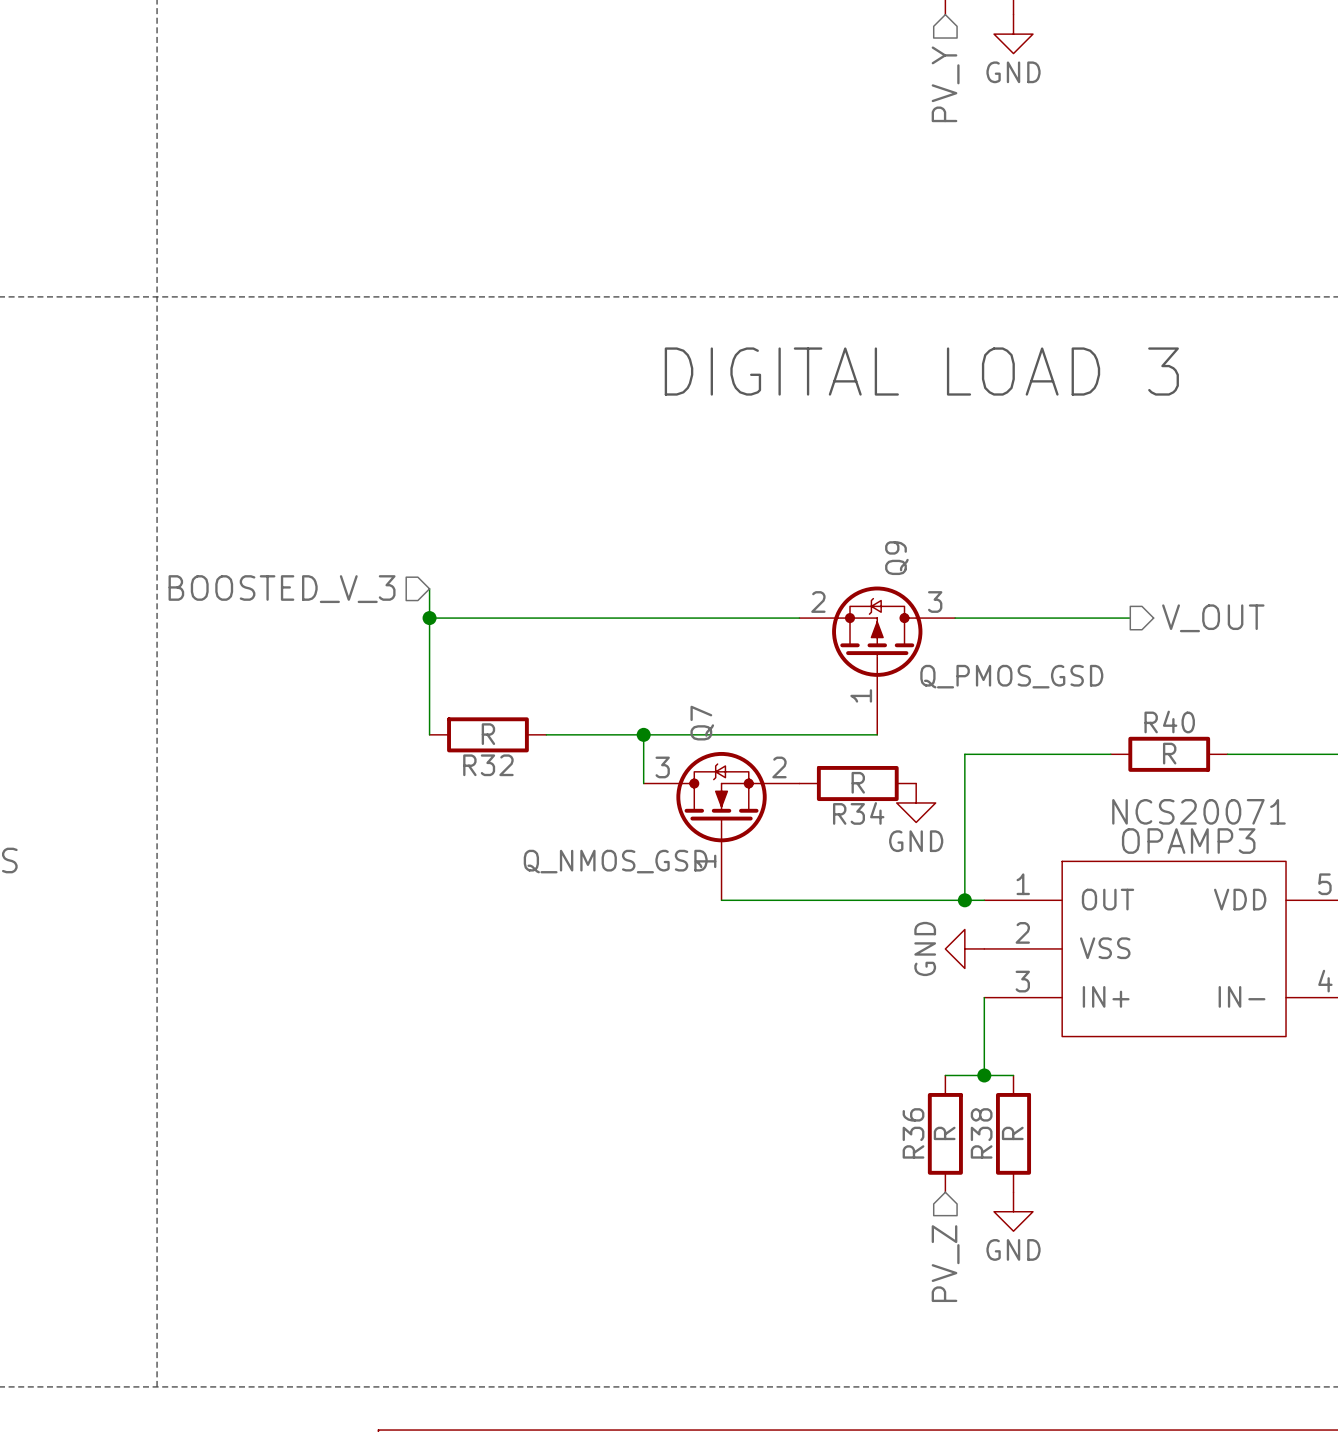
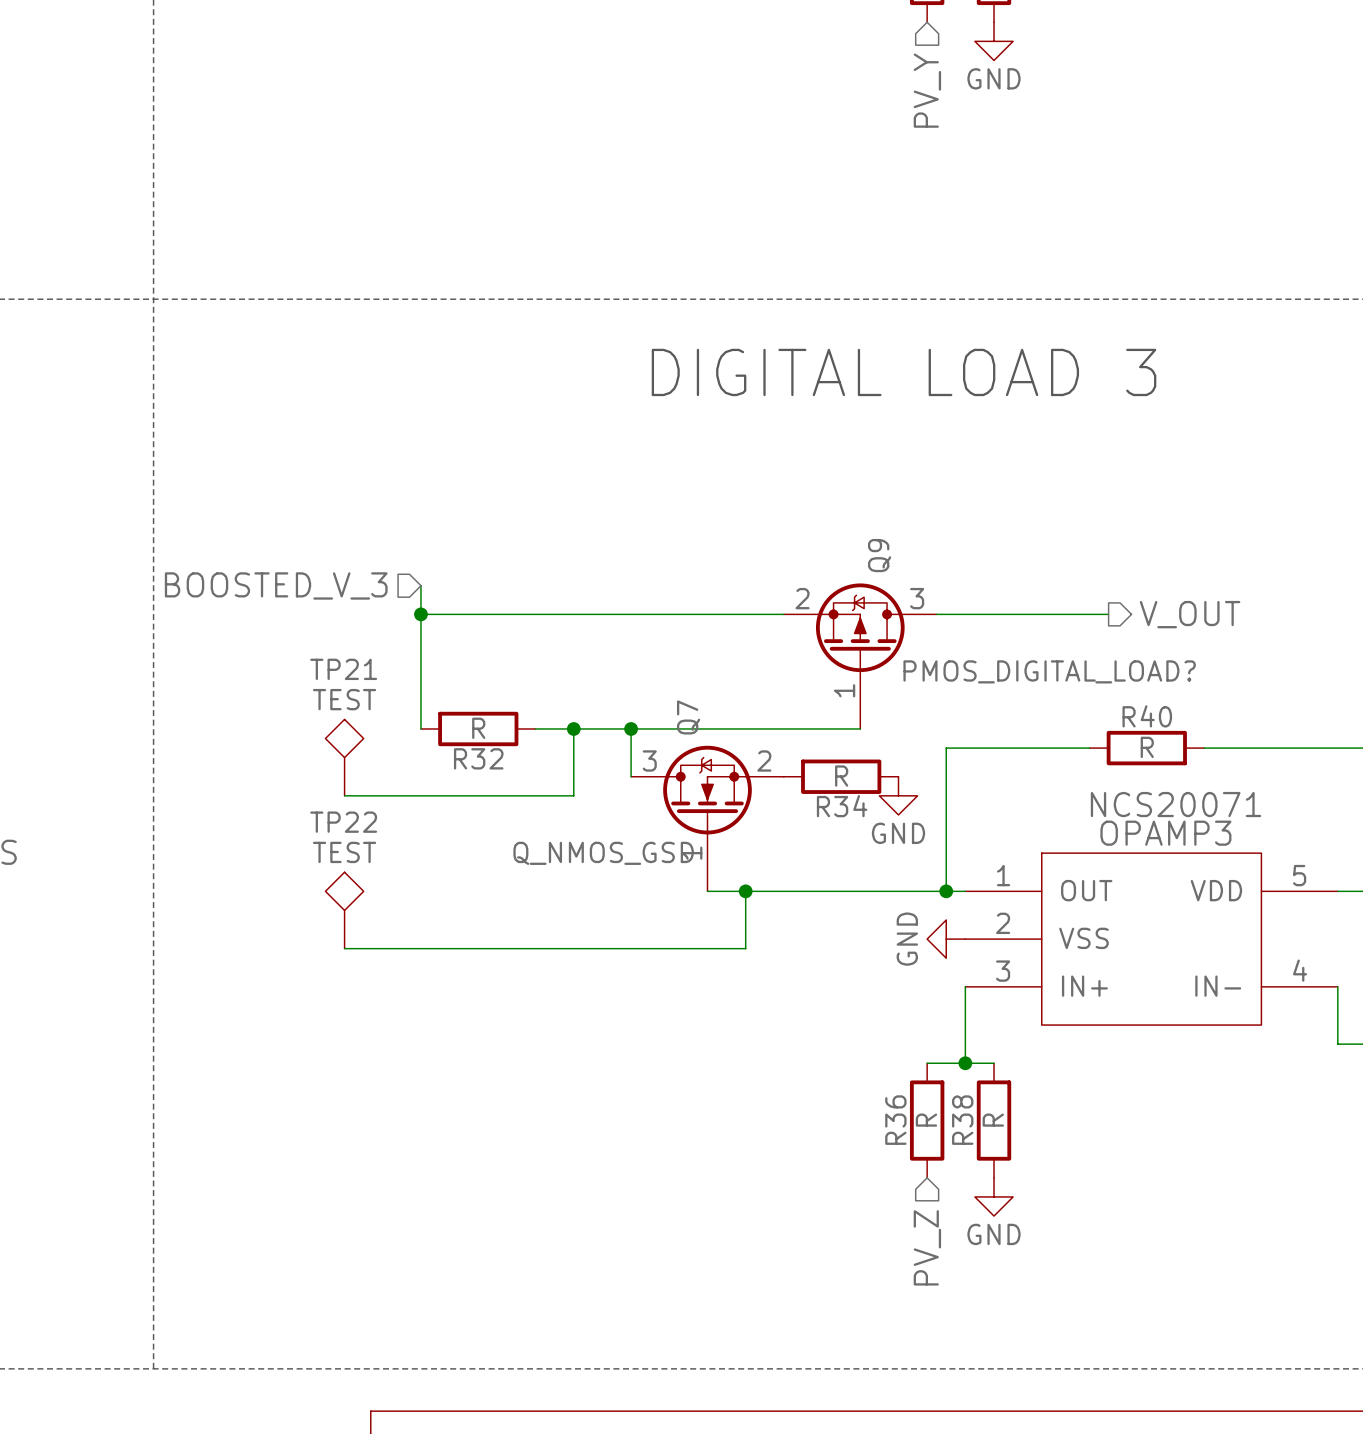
Q9 value: Q_PMOS_GSD (1011, 676) -> PMOS_DIGITAL_LOAD? (1049, 671)
wire: none -> (573, 728) (573, 795) (344, 795)
junction: none -> (573, 728)
TP21: none -> TEST (344, 757)
wire: none -> (745, 891) (745, 948) (344, 948)
junction: none -> (745, 891)
TP22: none -> TEST (344, 910)

